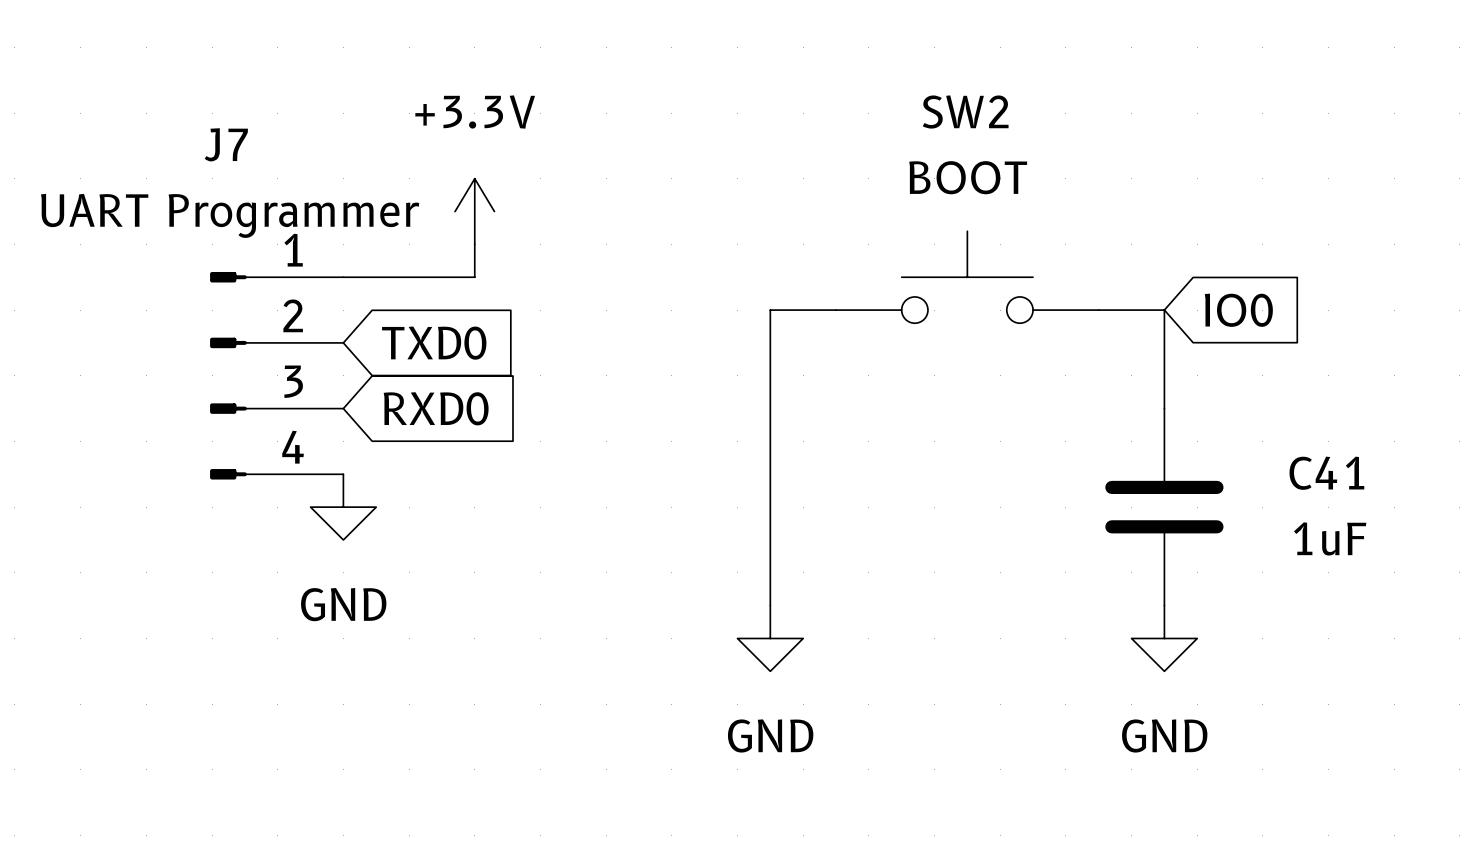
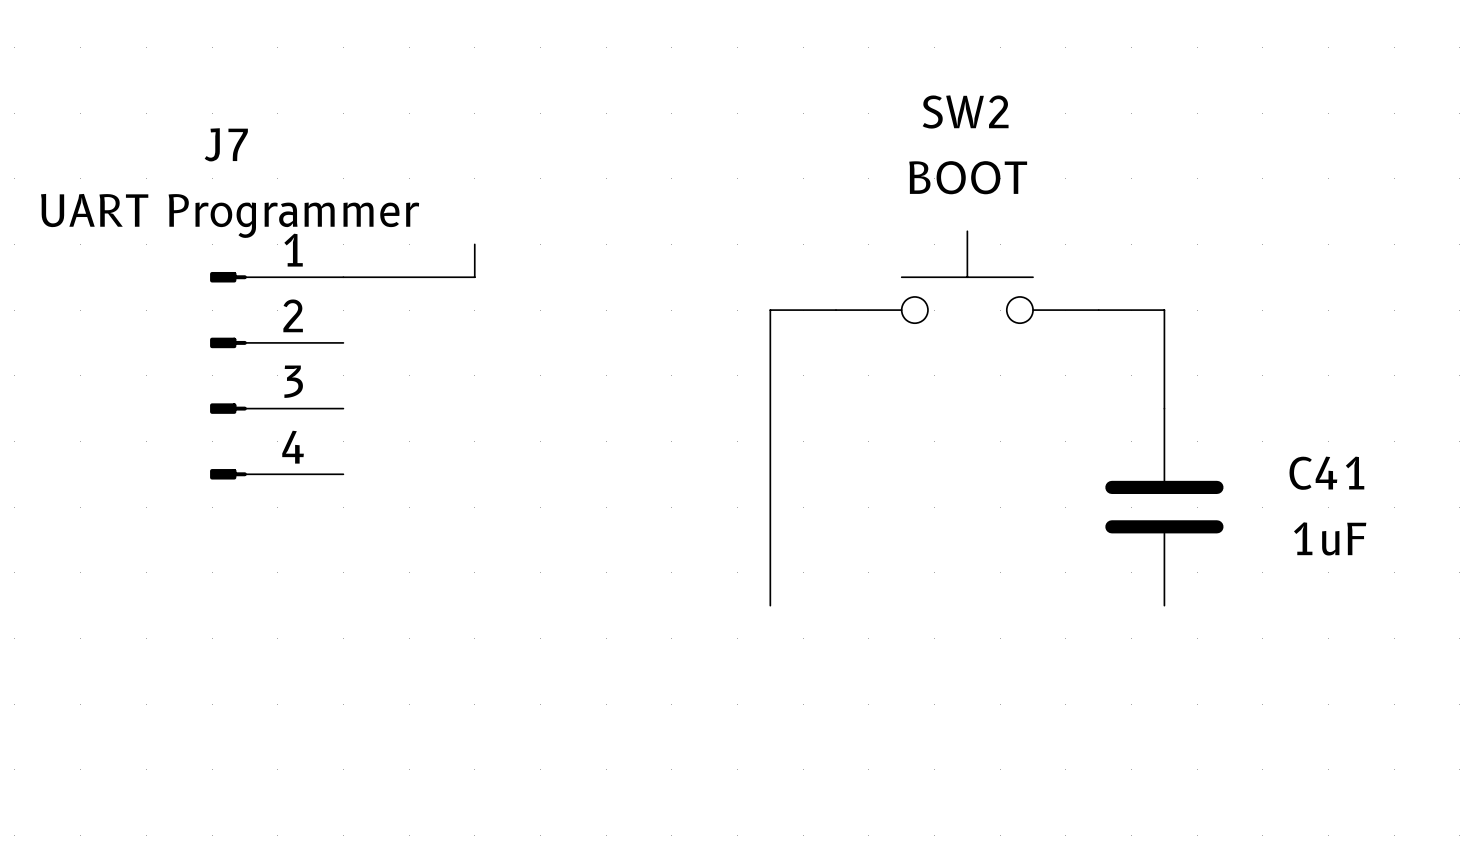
power symbol: +3.3V (474, 211) -> none
global label: IO0 (1238, 310) -> none
global label: TXD0 (434, 343) -> none
global label: RXD0 (436, 408) -> none
power symbol: GND (343, 507) -> none
power symbol: GND (770, 638) -> none
power symbol: GND (1164, 638) -> none

